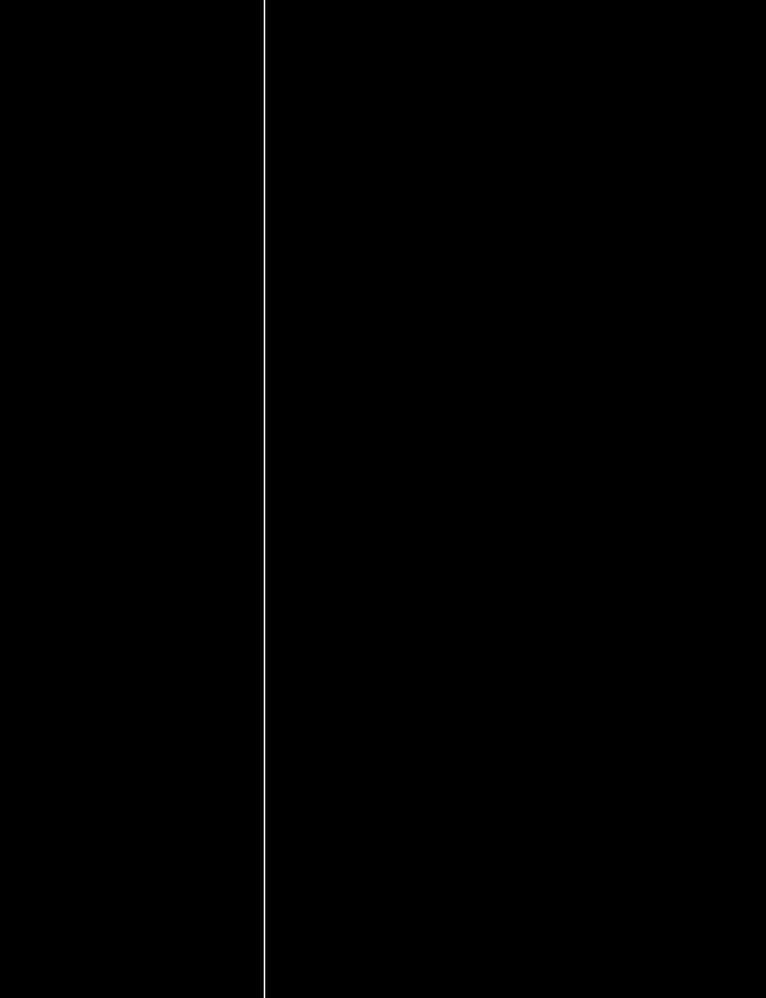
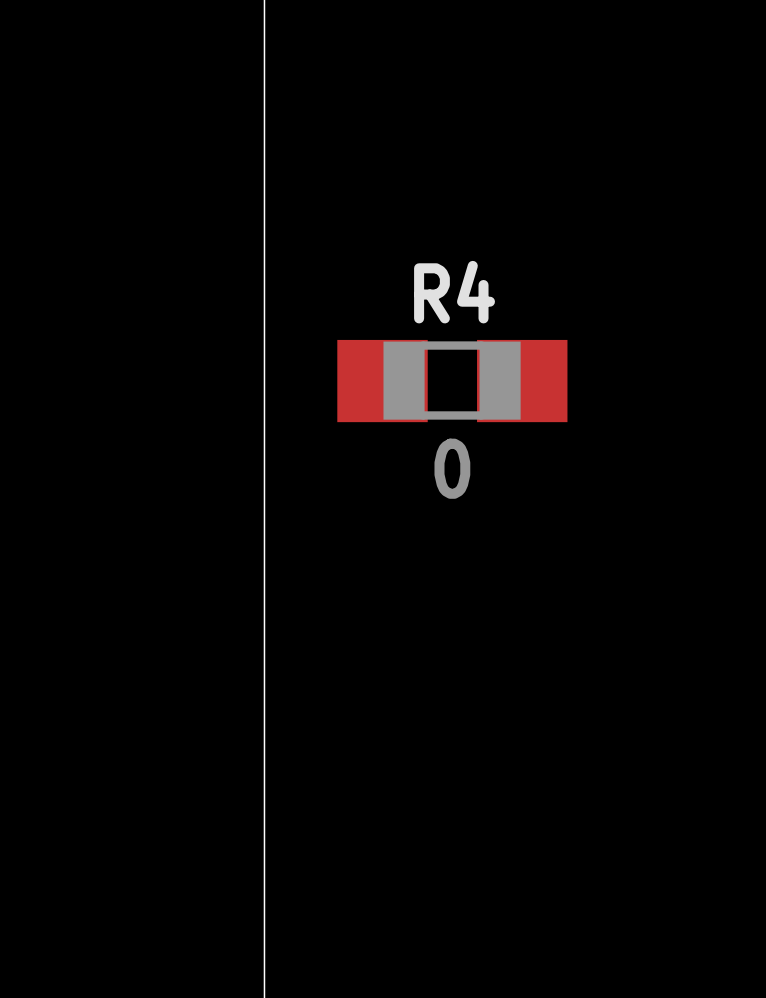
R4: none -> 0 (452, 381)

